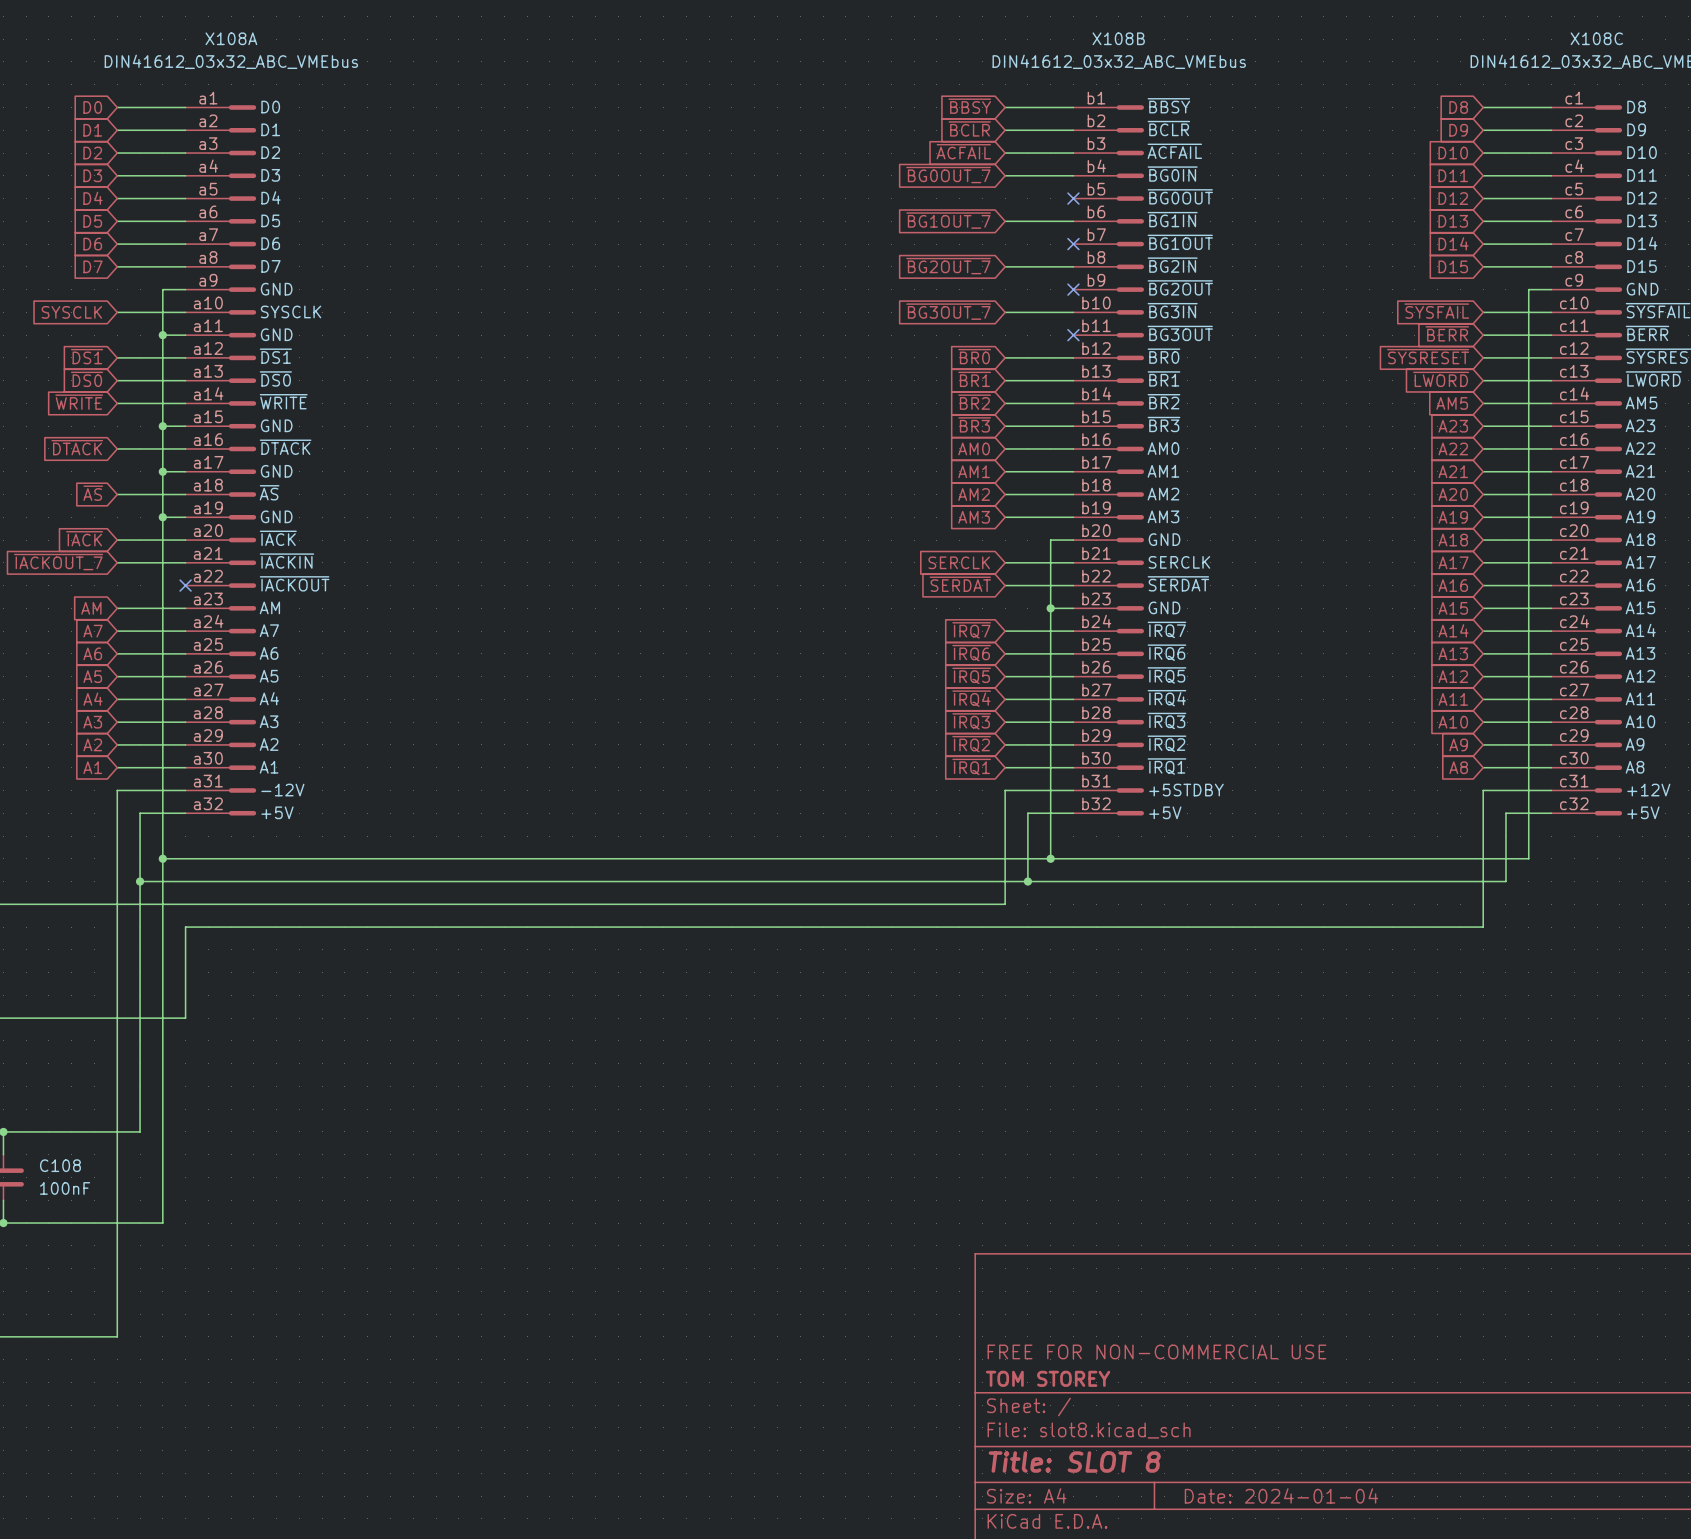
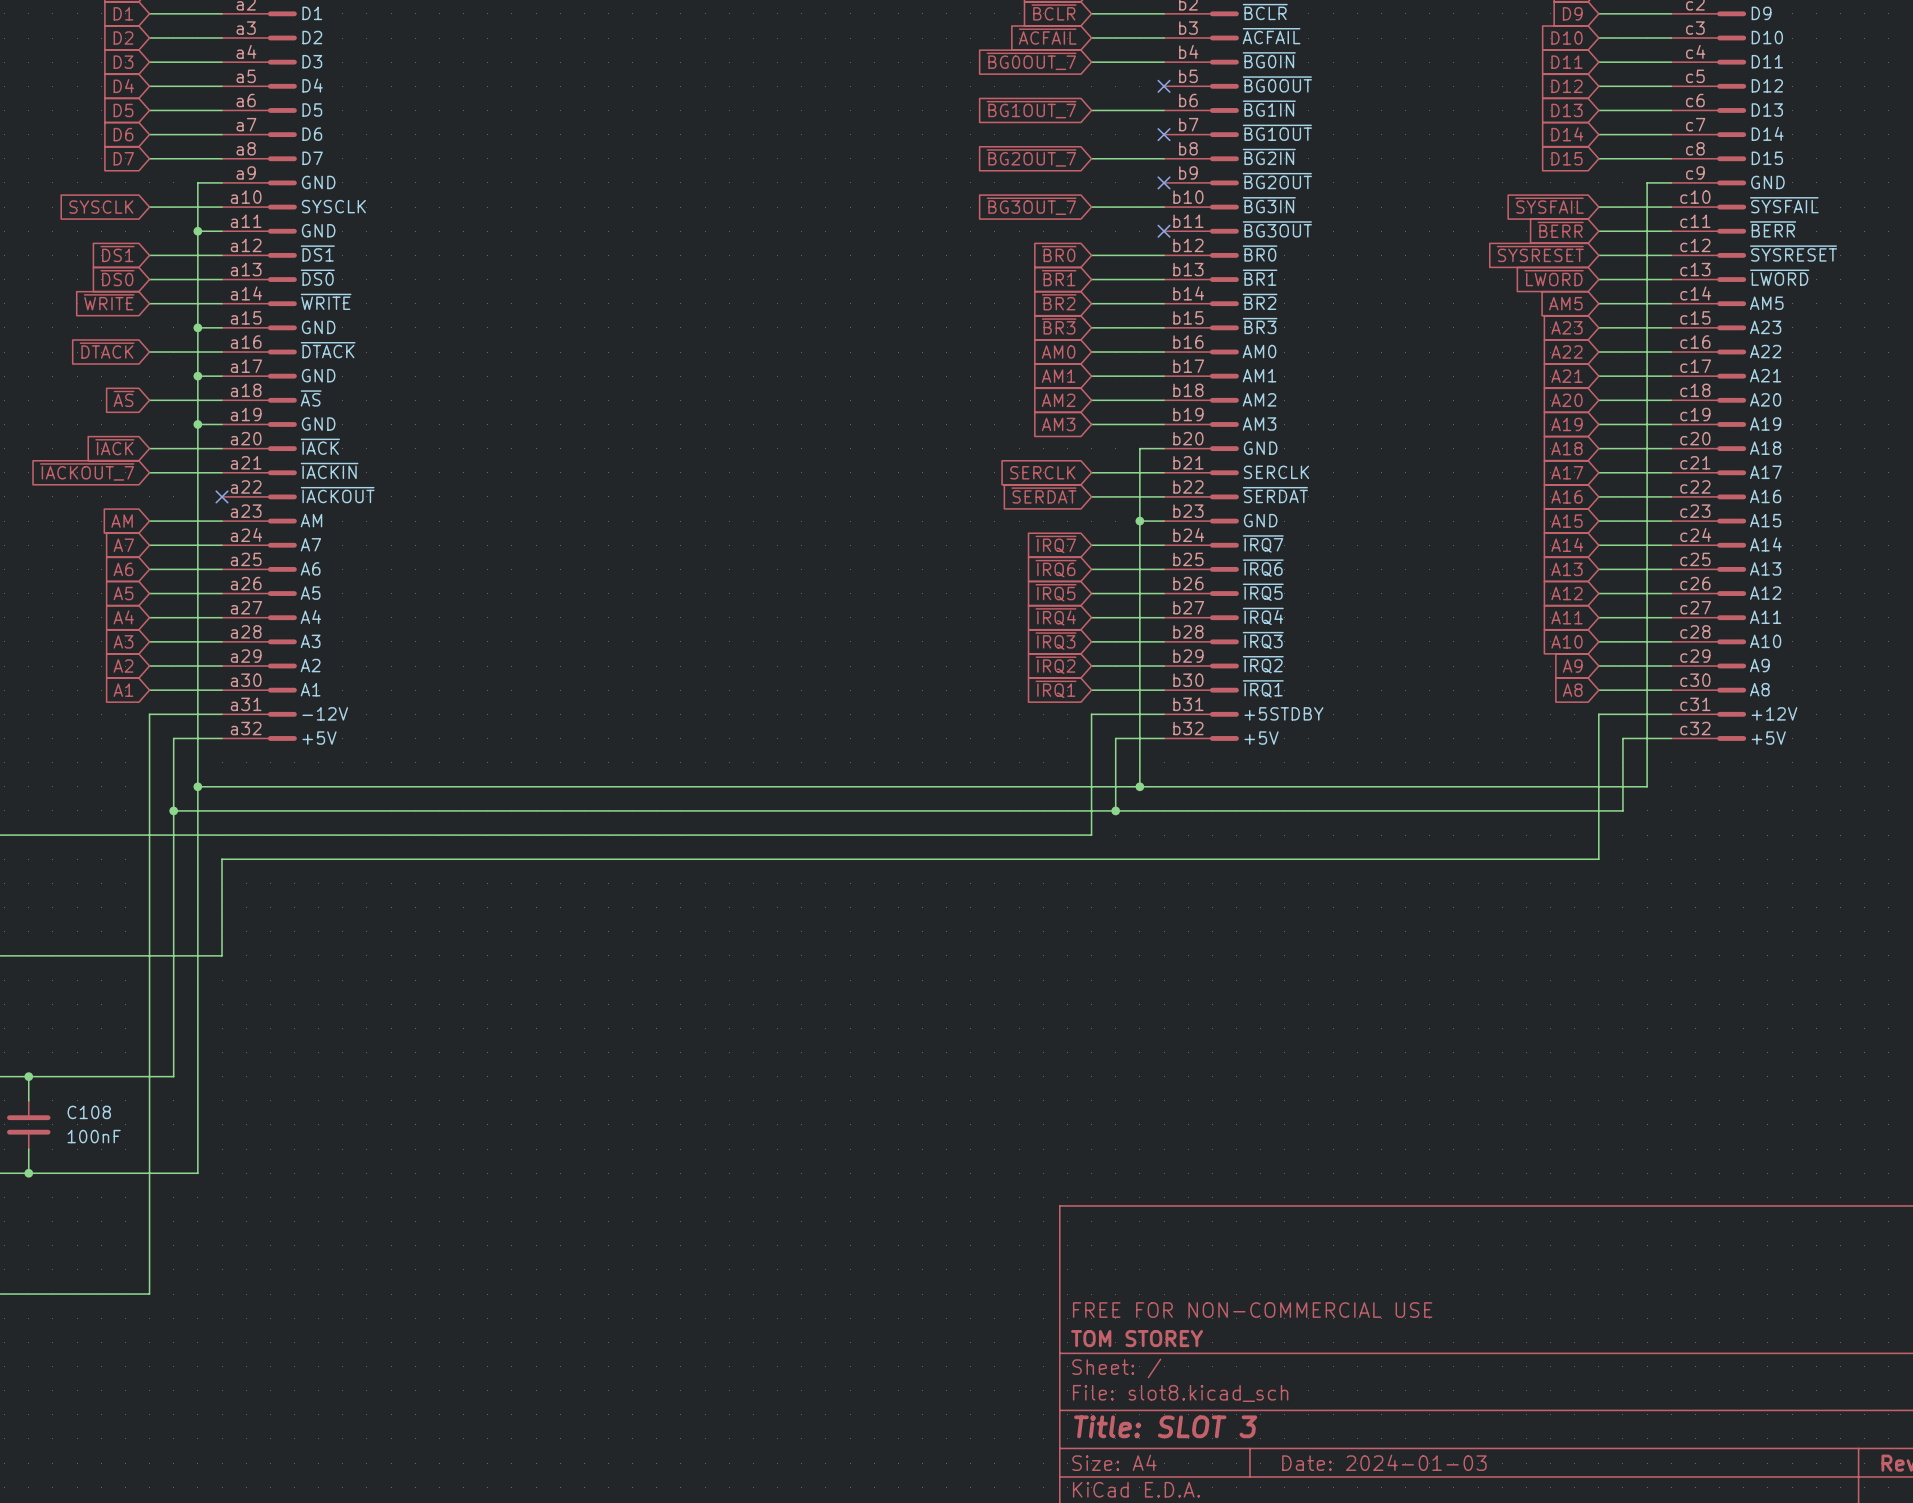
title block: Title: SLOT 8 (1074, 1462) -> Title: SLOT 3 (1165, 1426)
title block: Date: 2024-01-04 (1281, 1495) -> Date: 2024-01-03 (1384, 1462)

